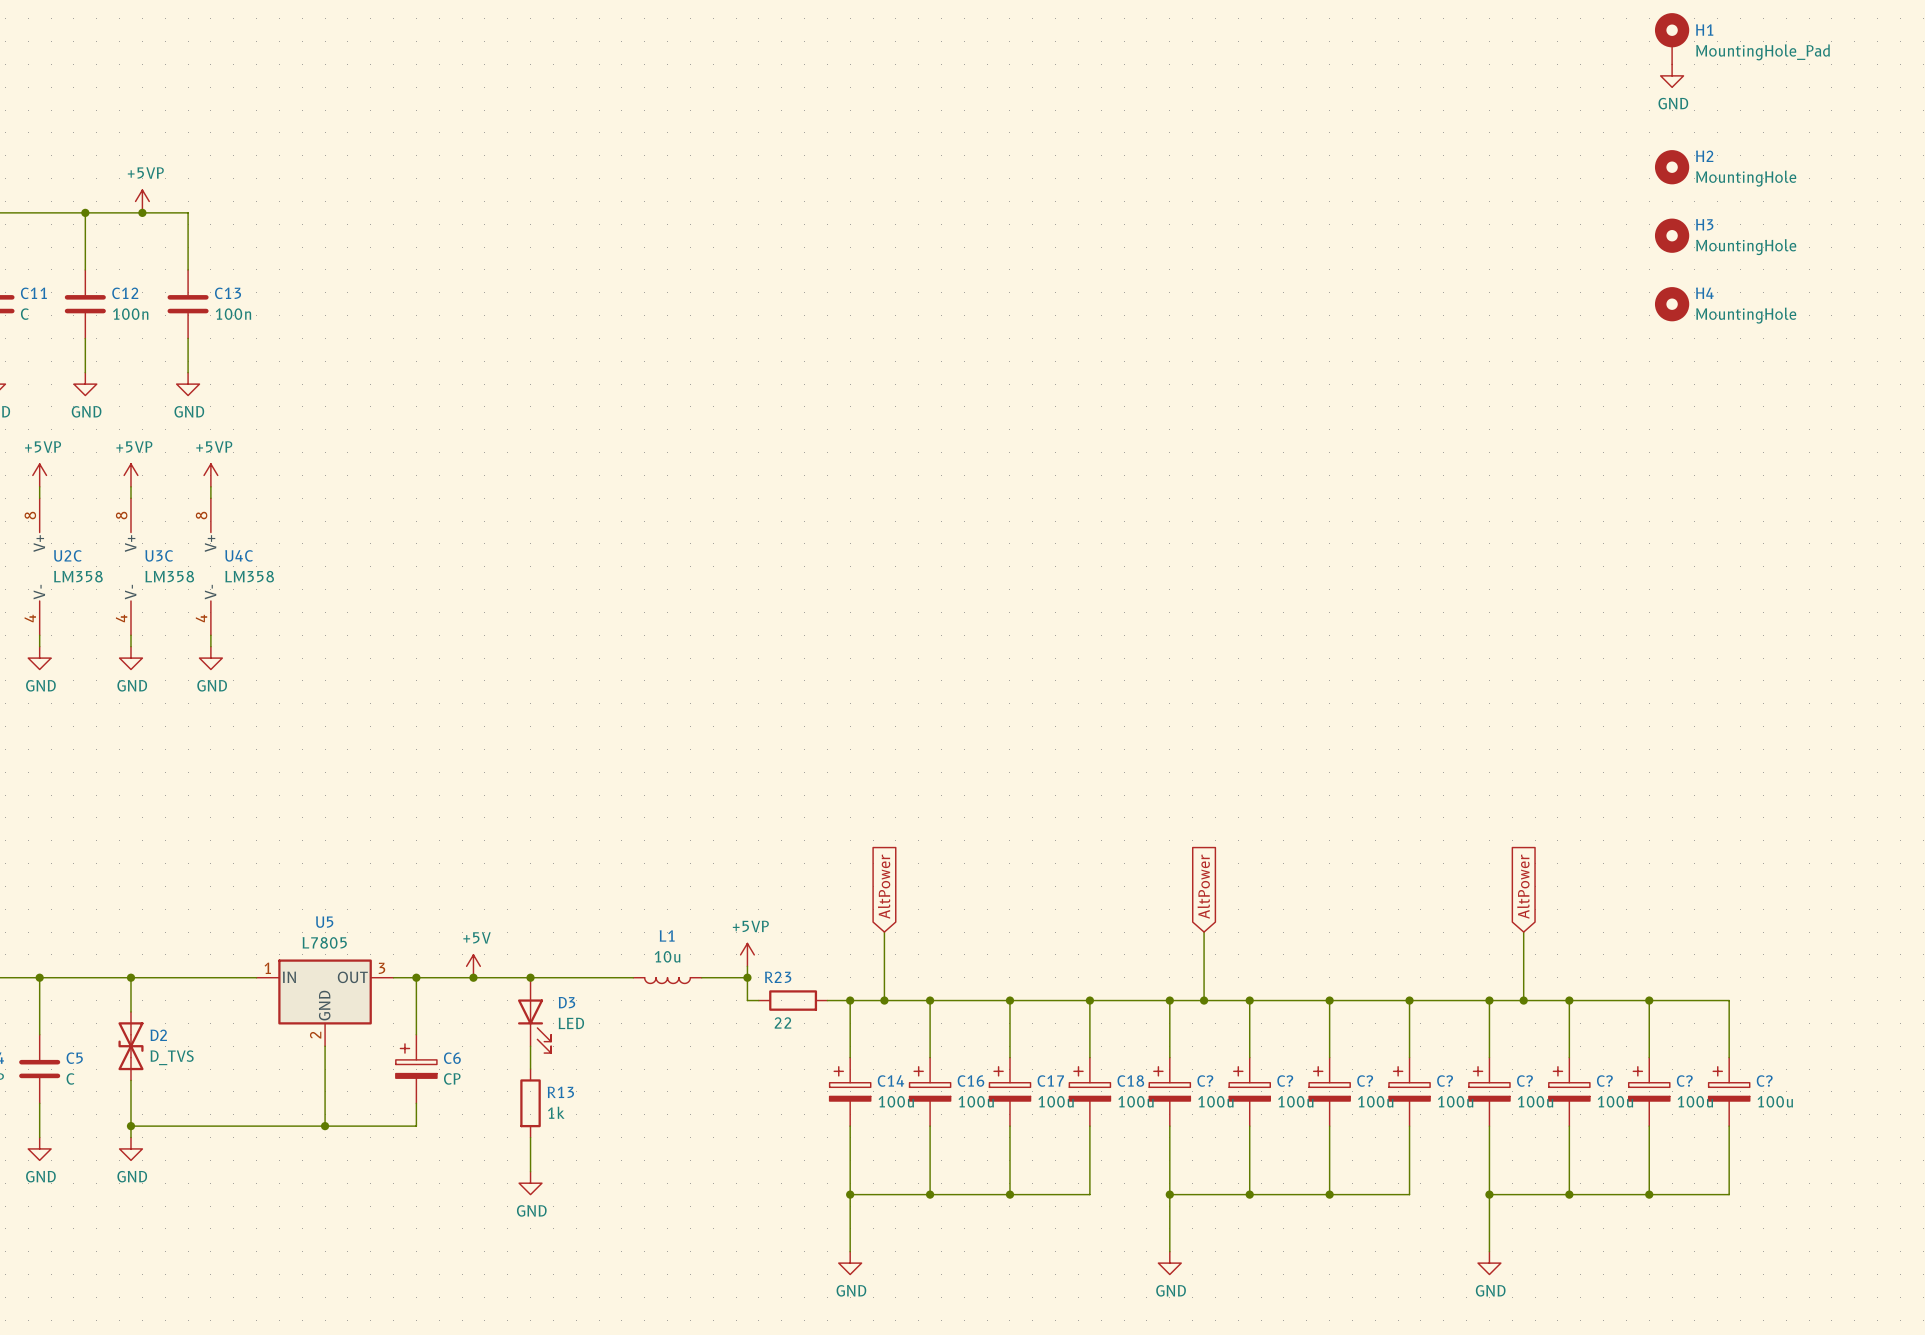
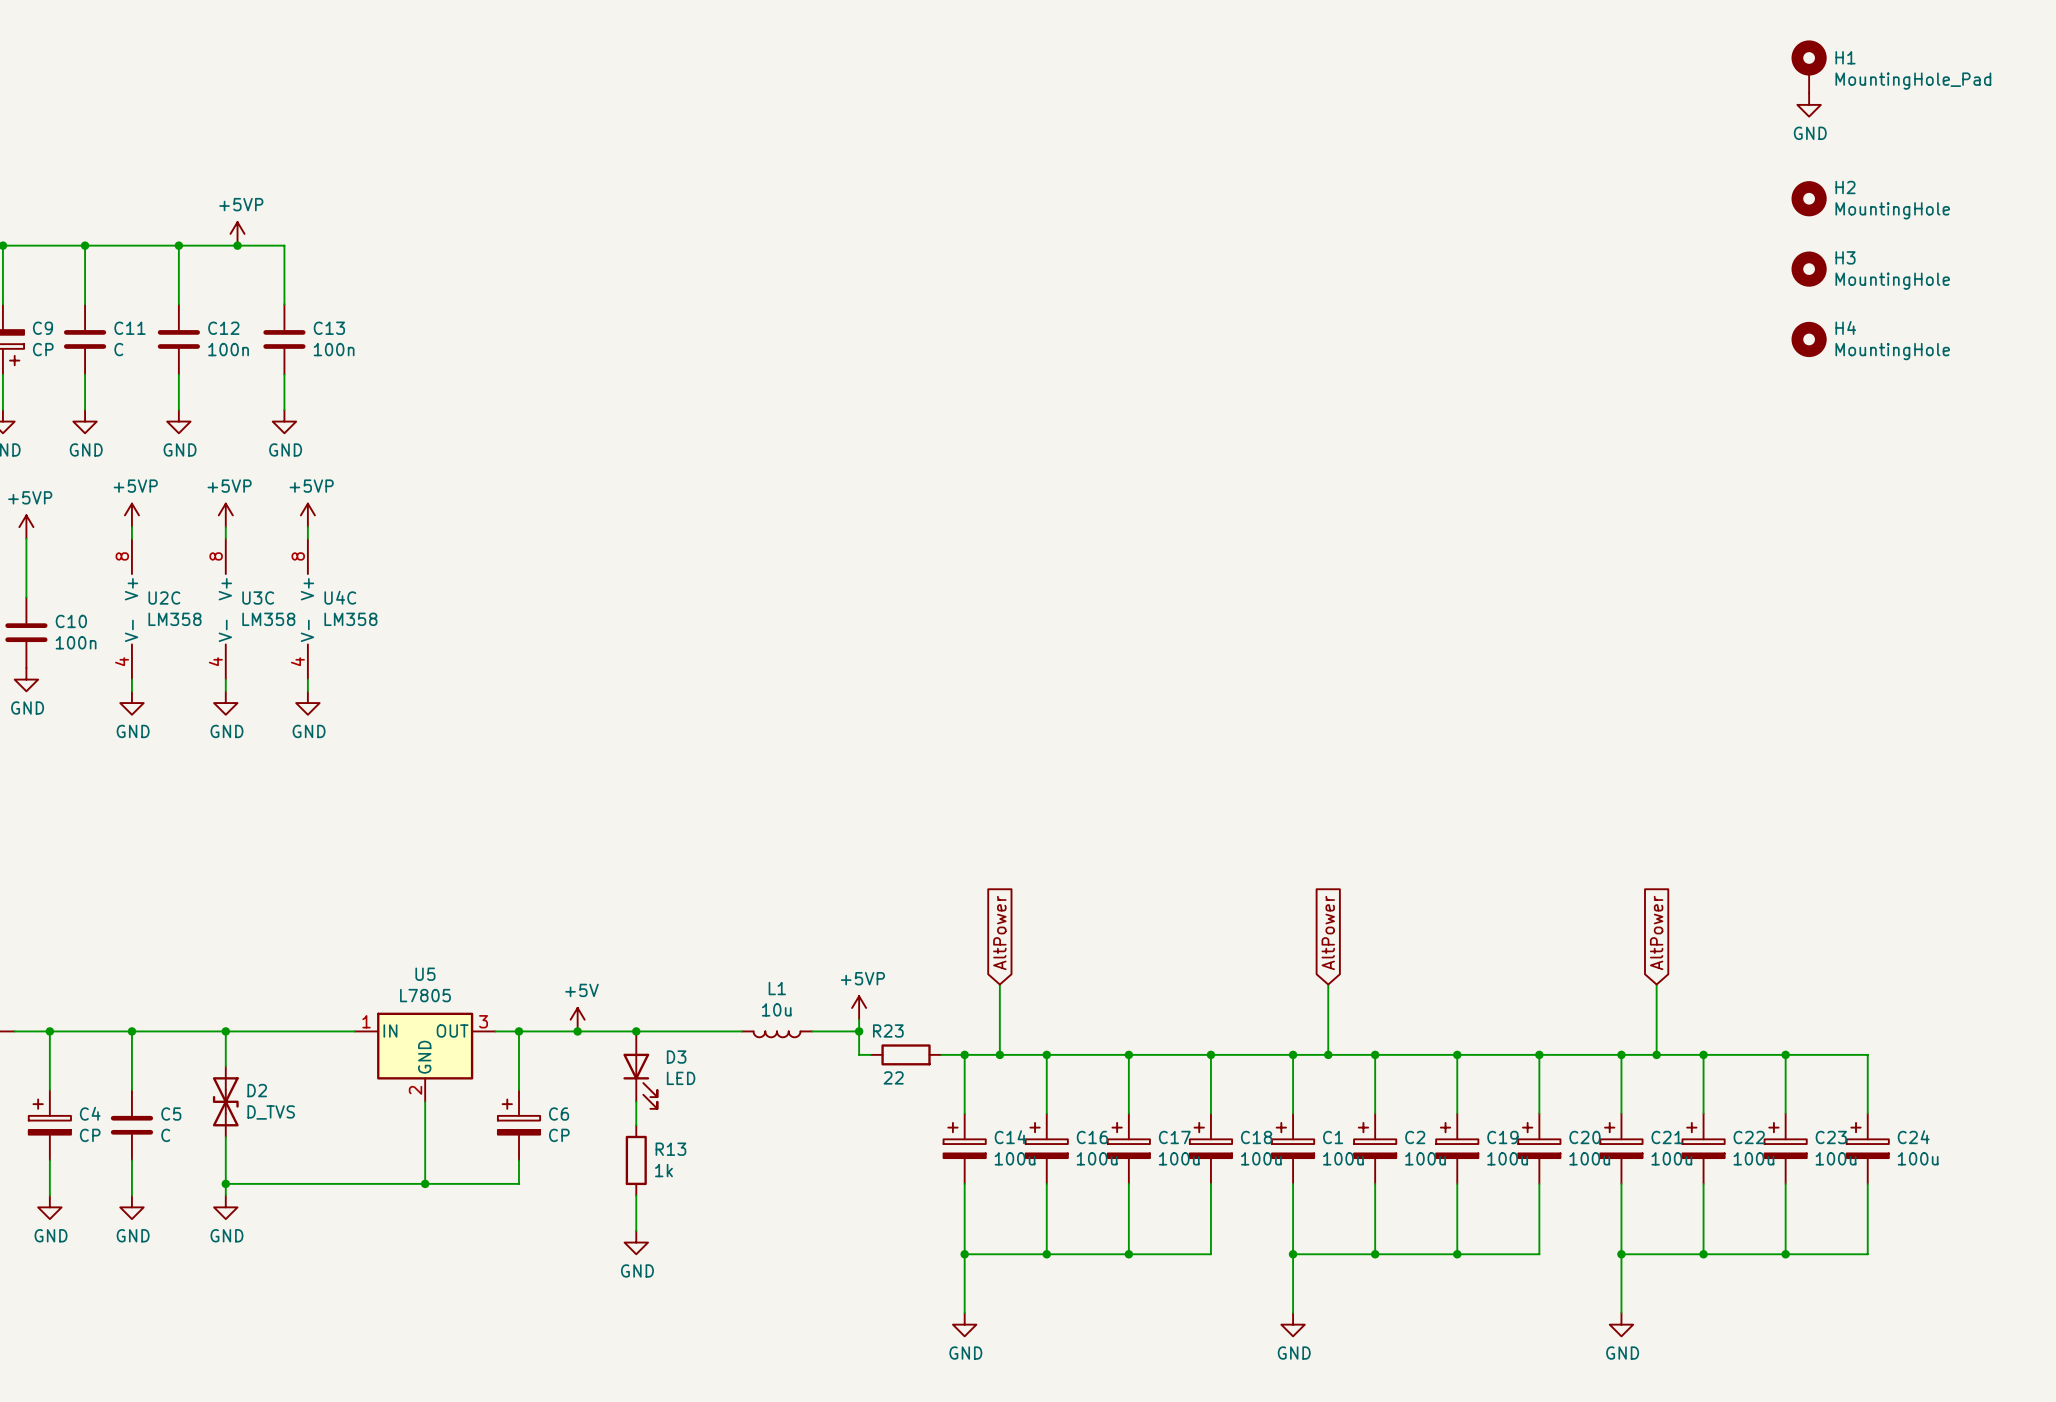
C? name: C? (1205, 1081) -> C1 (1333, 1137)
C? name: C? (1285, 1081) -> C2 (1415, 1137)
C? name: C? (1365, 1081) -> C19 (1502, 1137)
C? name: C? (1445, 1081) -> C20 (1585, 1137)
C? name: C? (1524, 1081) -> C21 (1667, 1137)
C? name: C? (1604, 1081) -> C22 (1749, 1137)
C? name: C? (1684, 1081) -> C23 (1831, 1137)
C? name: C? (1764, 1081) -> C24 (1913, 1137)

